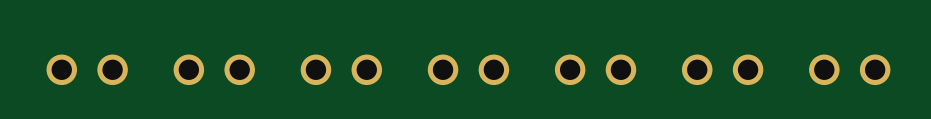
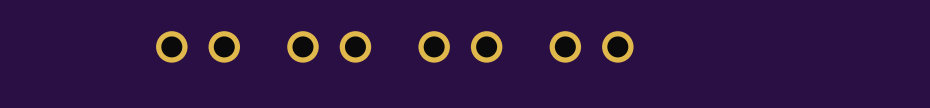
part: (87, 69) -> none
part: (722, 69) -> none
part: (849, 69) -> none

